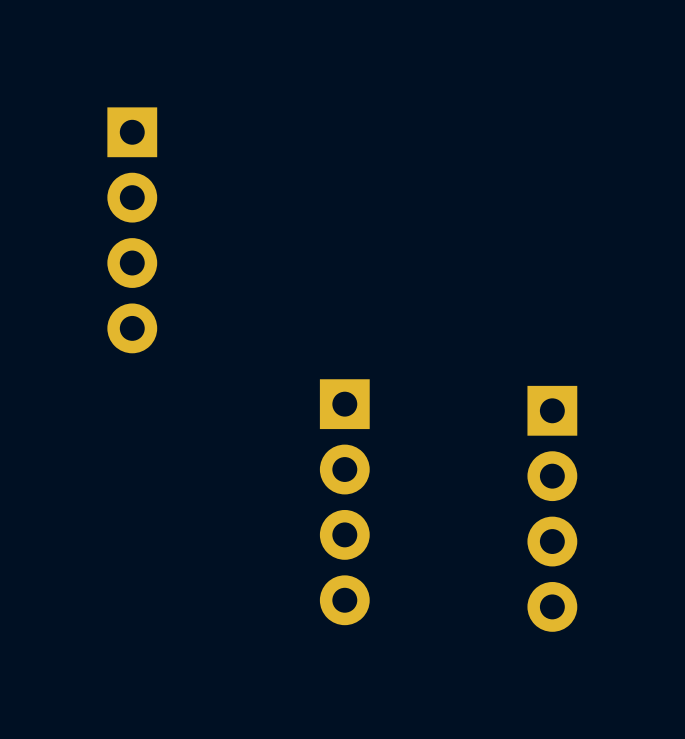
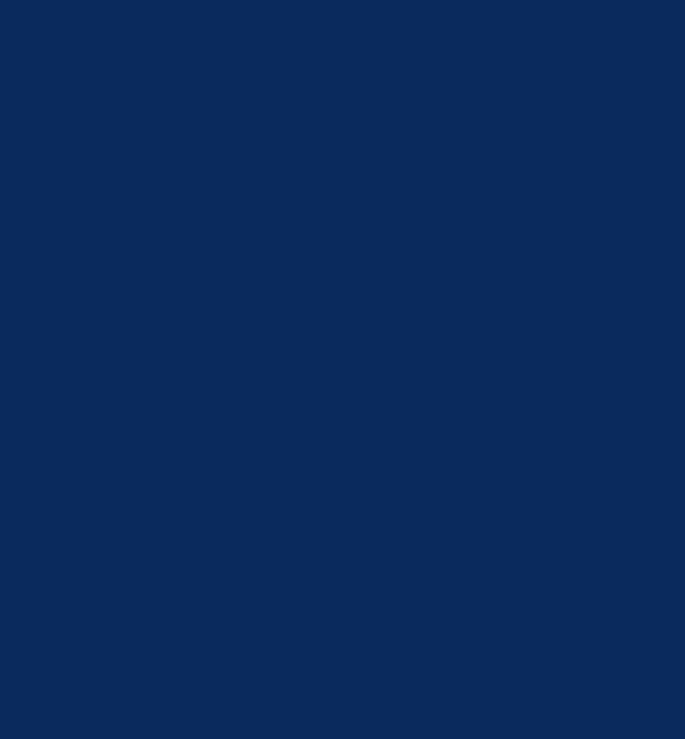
part: (132, 230) -> none
part: (344, 502) -> none
part: (552, 508) -> none

